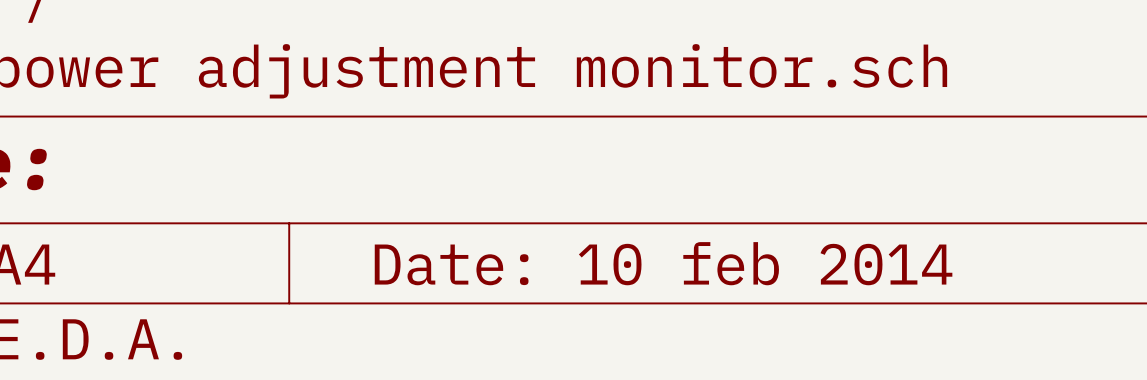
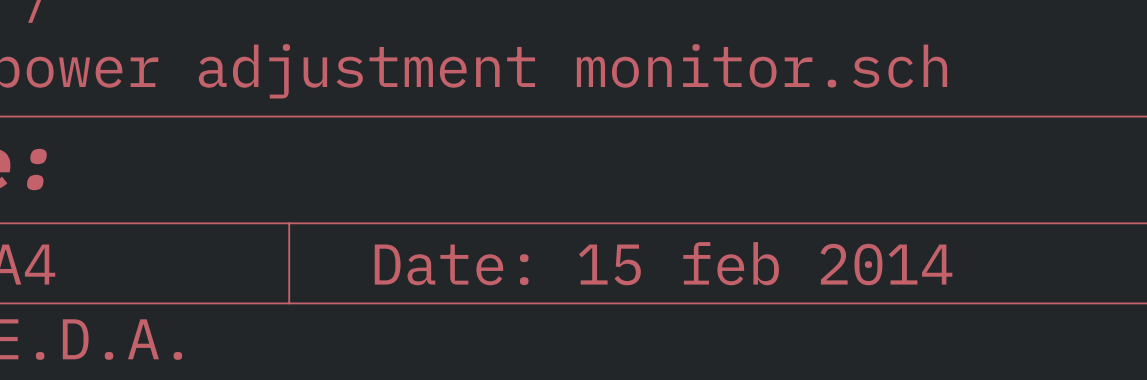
title block: Date: 10 feb 2014 (663, 263) -> Date: 15 feb 2014 (663, 263)

